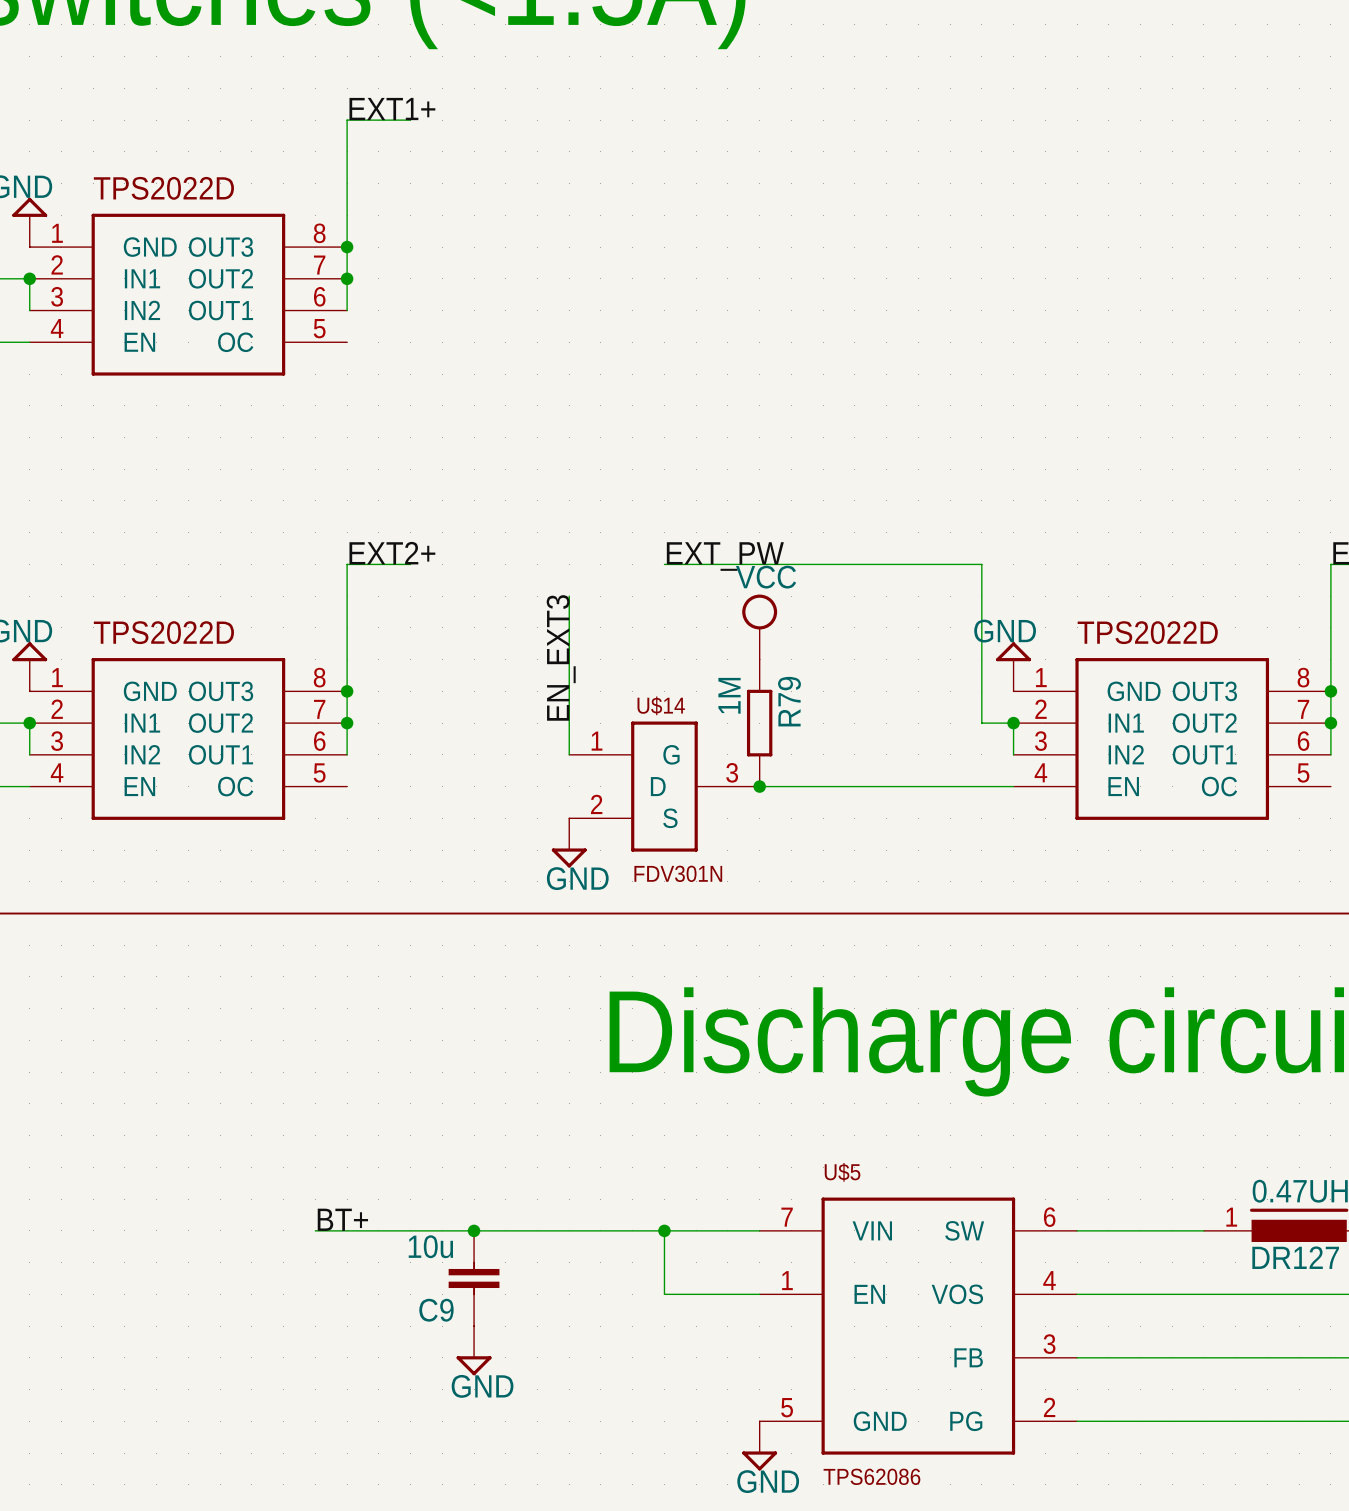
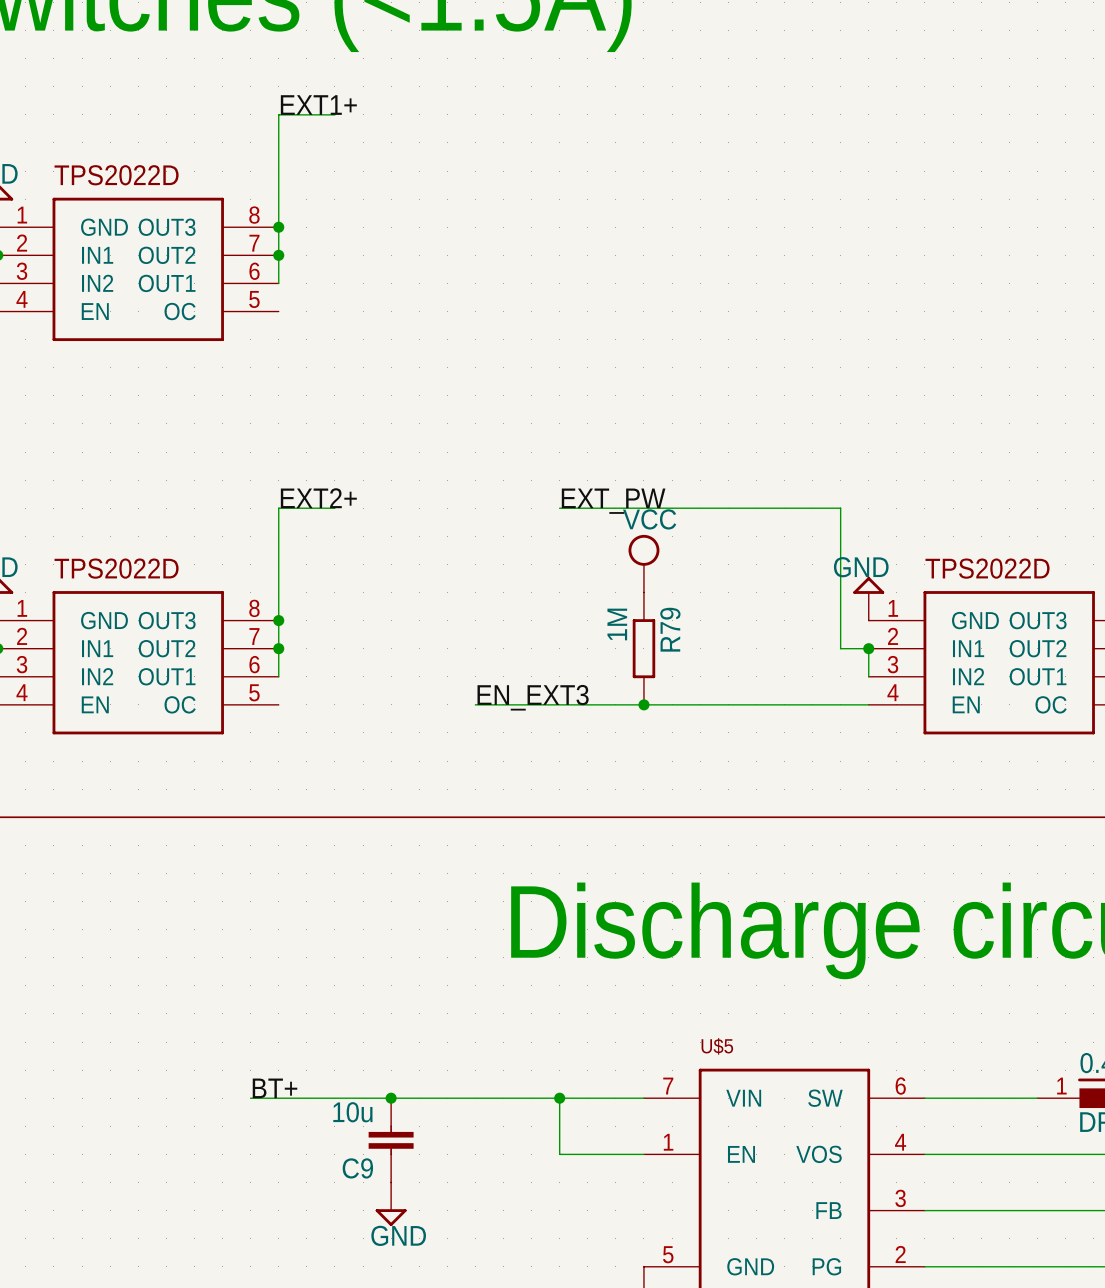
wire: (569, 596) (569, 754) -> none
label rotation: 0° (561, 657) -> 90° clockwise (533, 697)
label position: EN_EXT3 (561, 657) -> EN_EXT3 (533, 697)
wire: none -> (475, 704) (643, 704)
U$14: FDV301N (664, 786) -> none
power symbol: GND (569, 842) -> none

